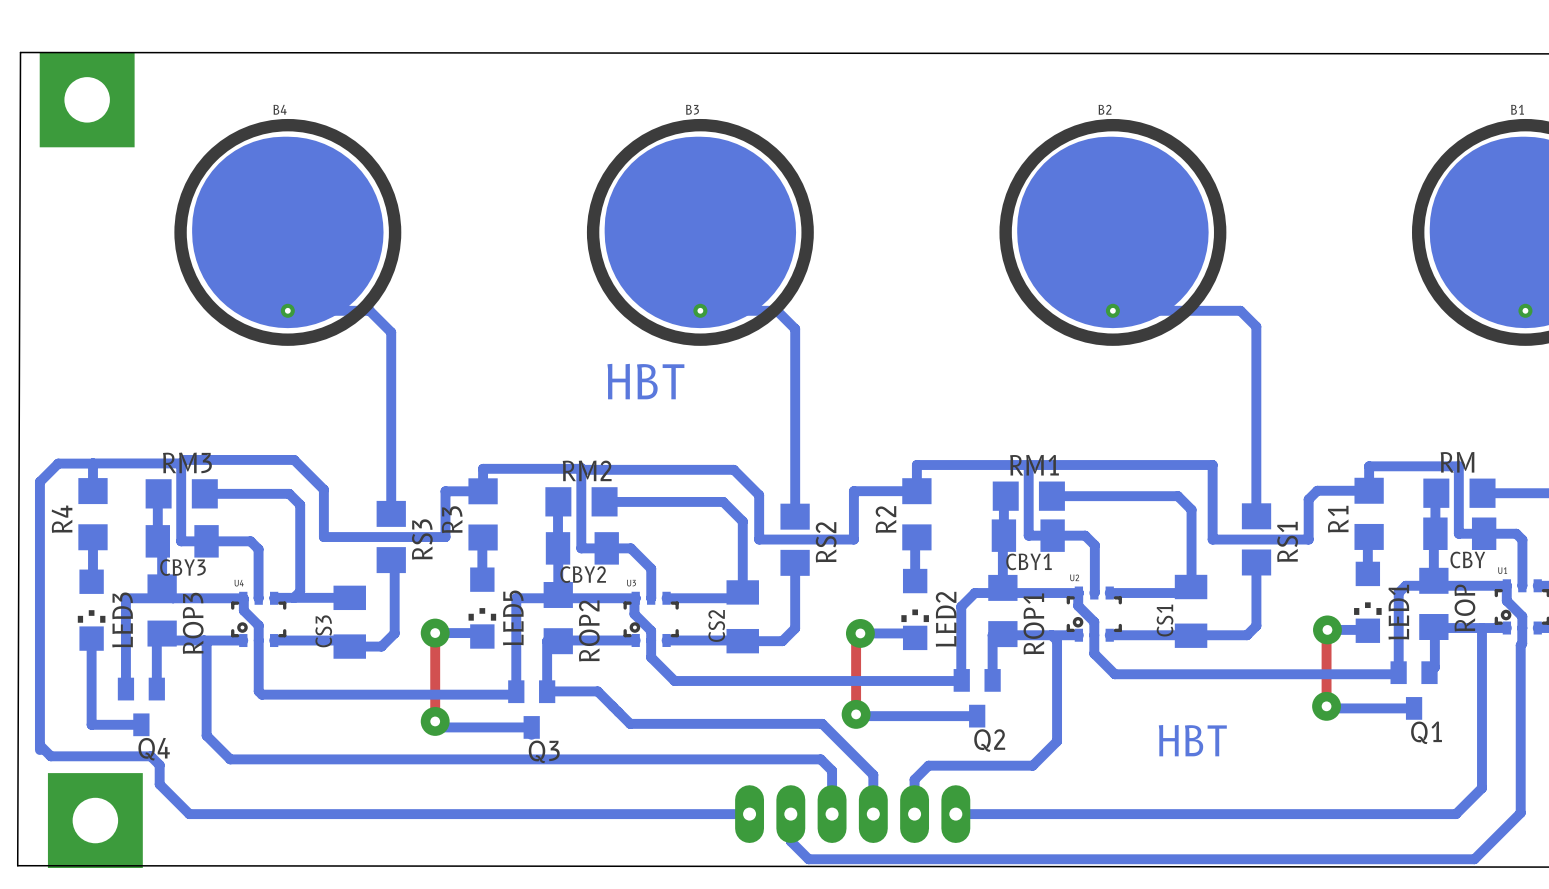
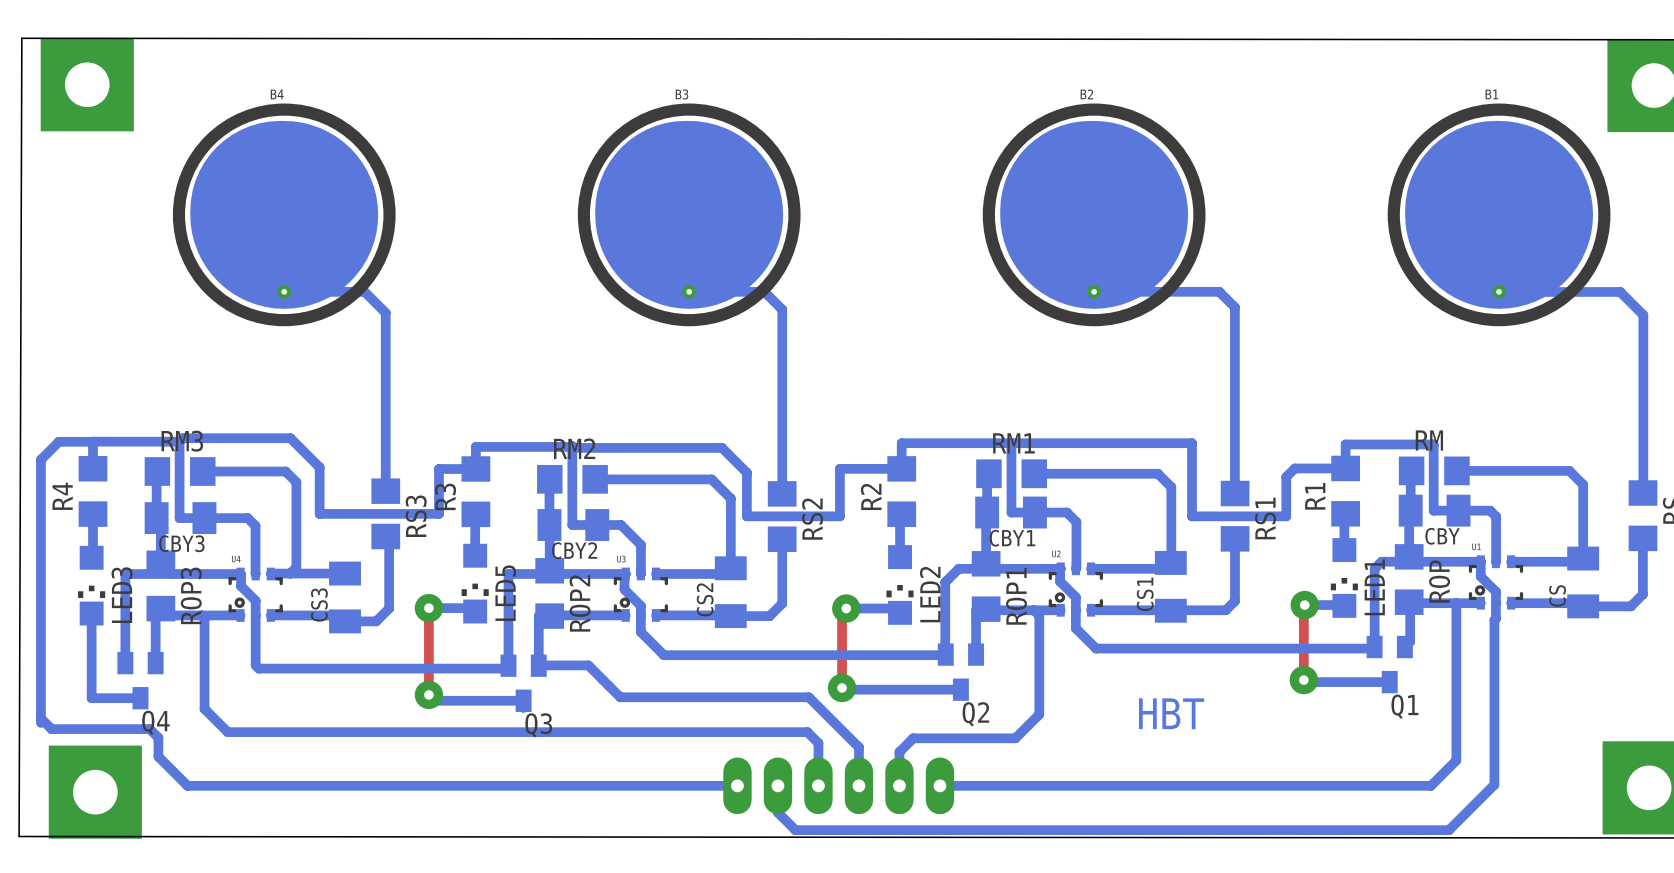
text: HBT (645, 381) -> none

